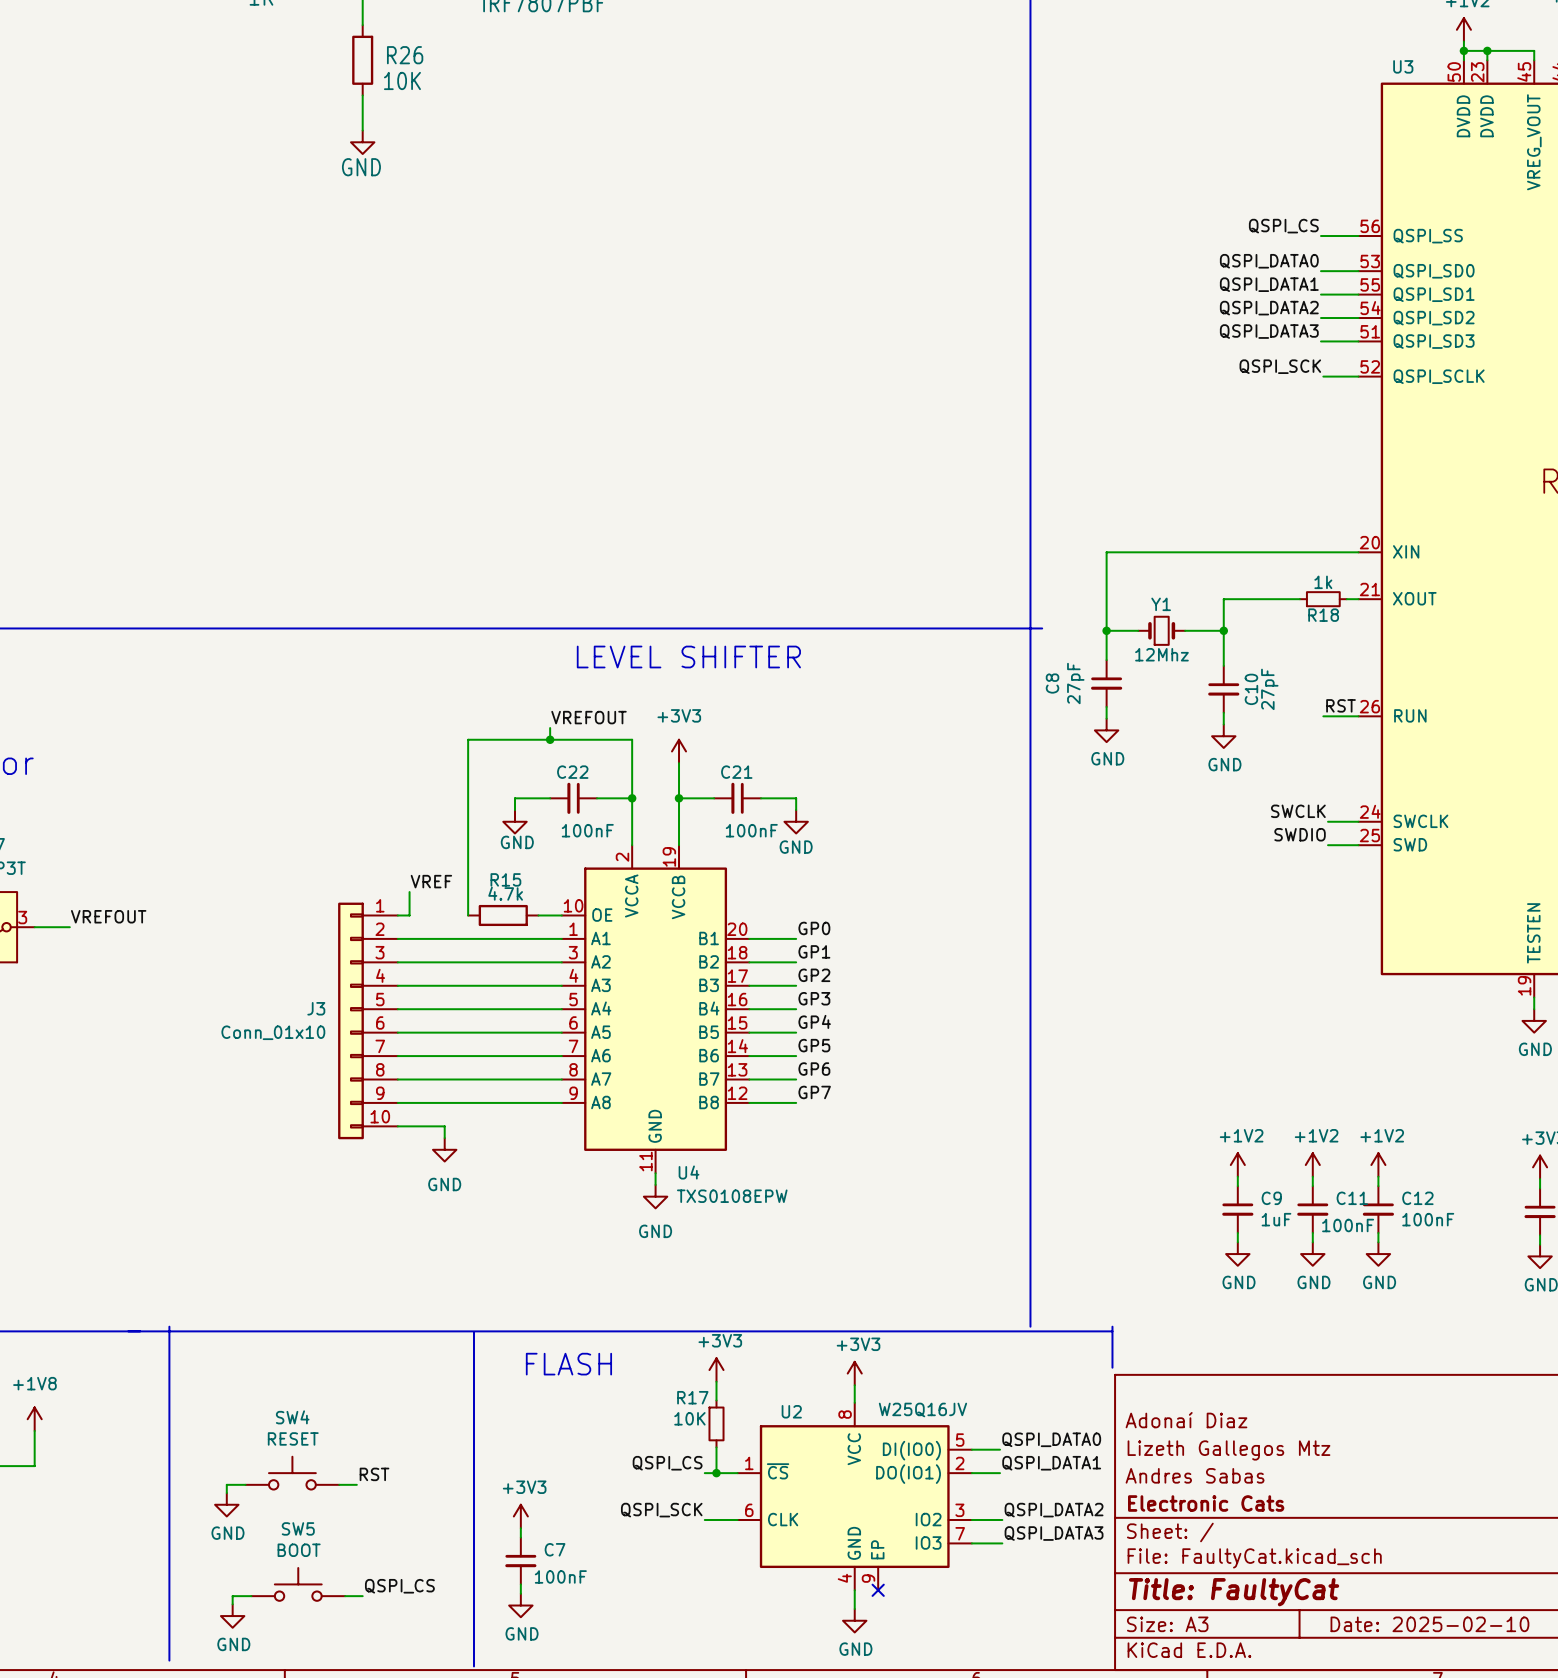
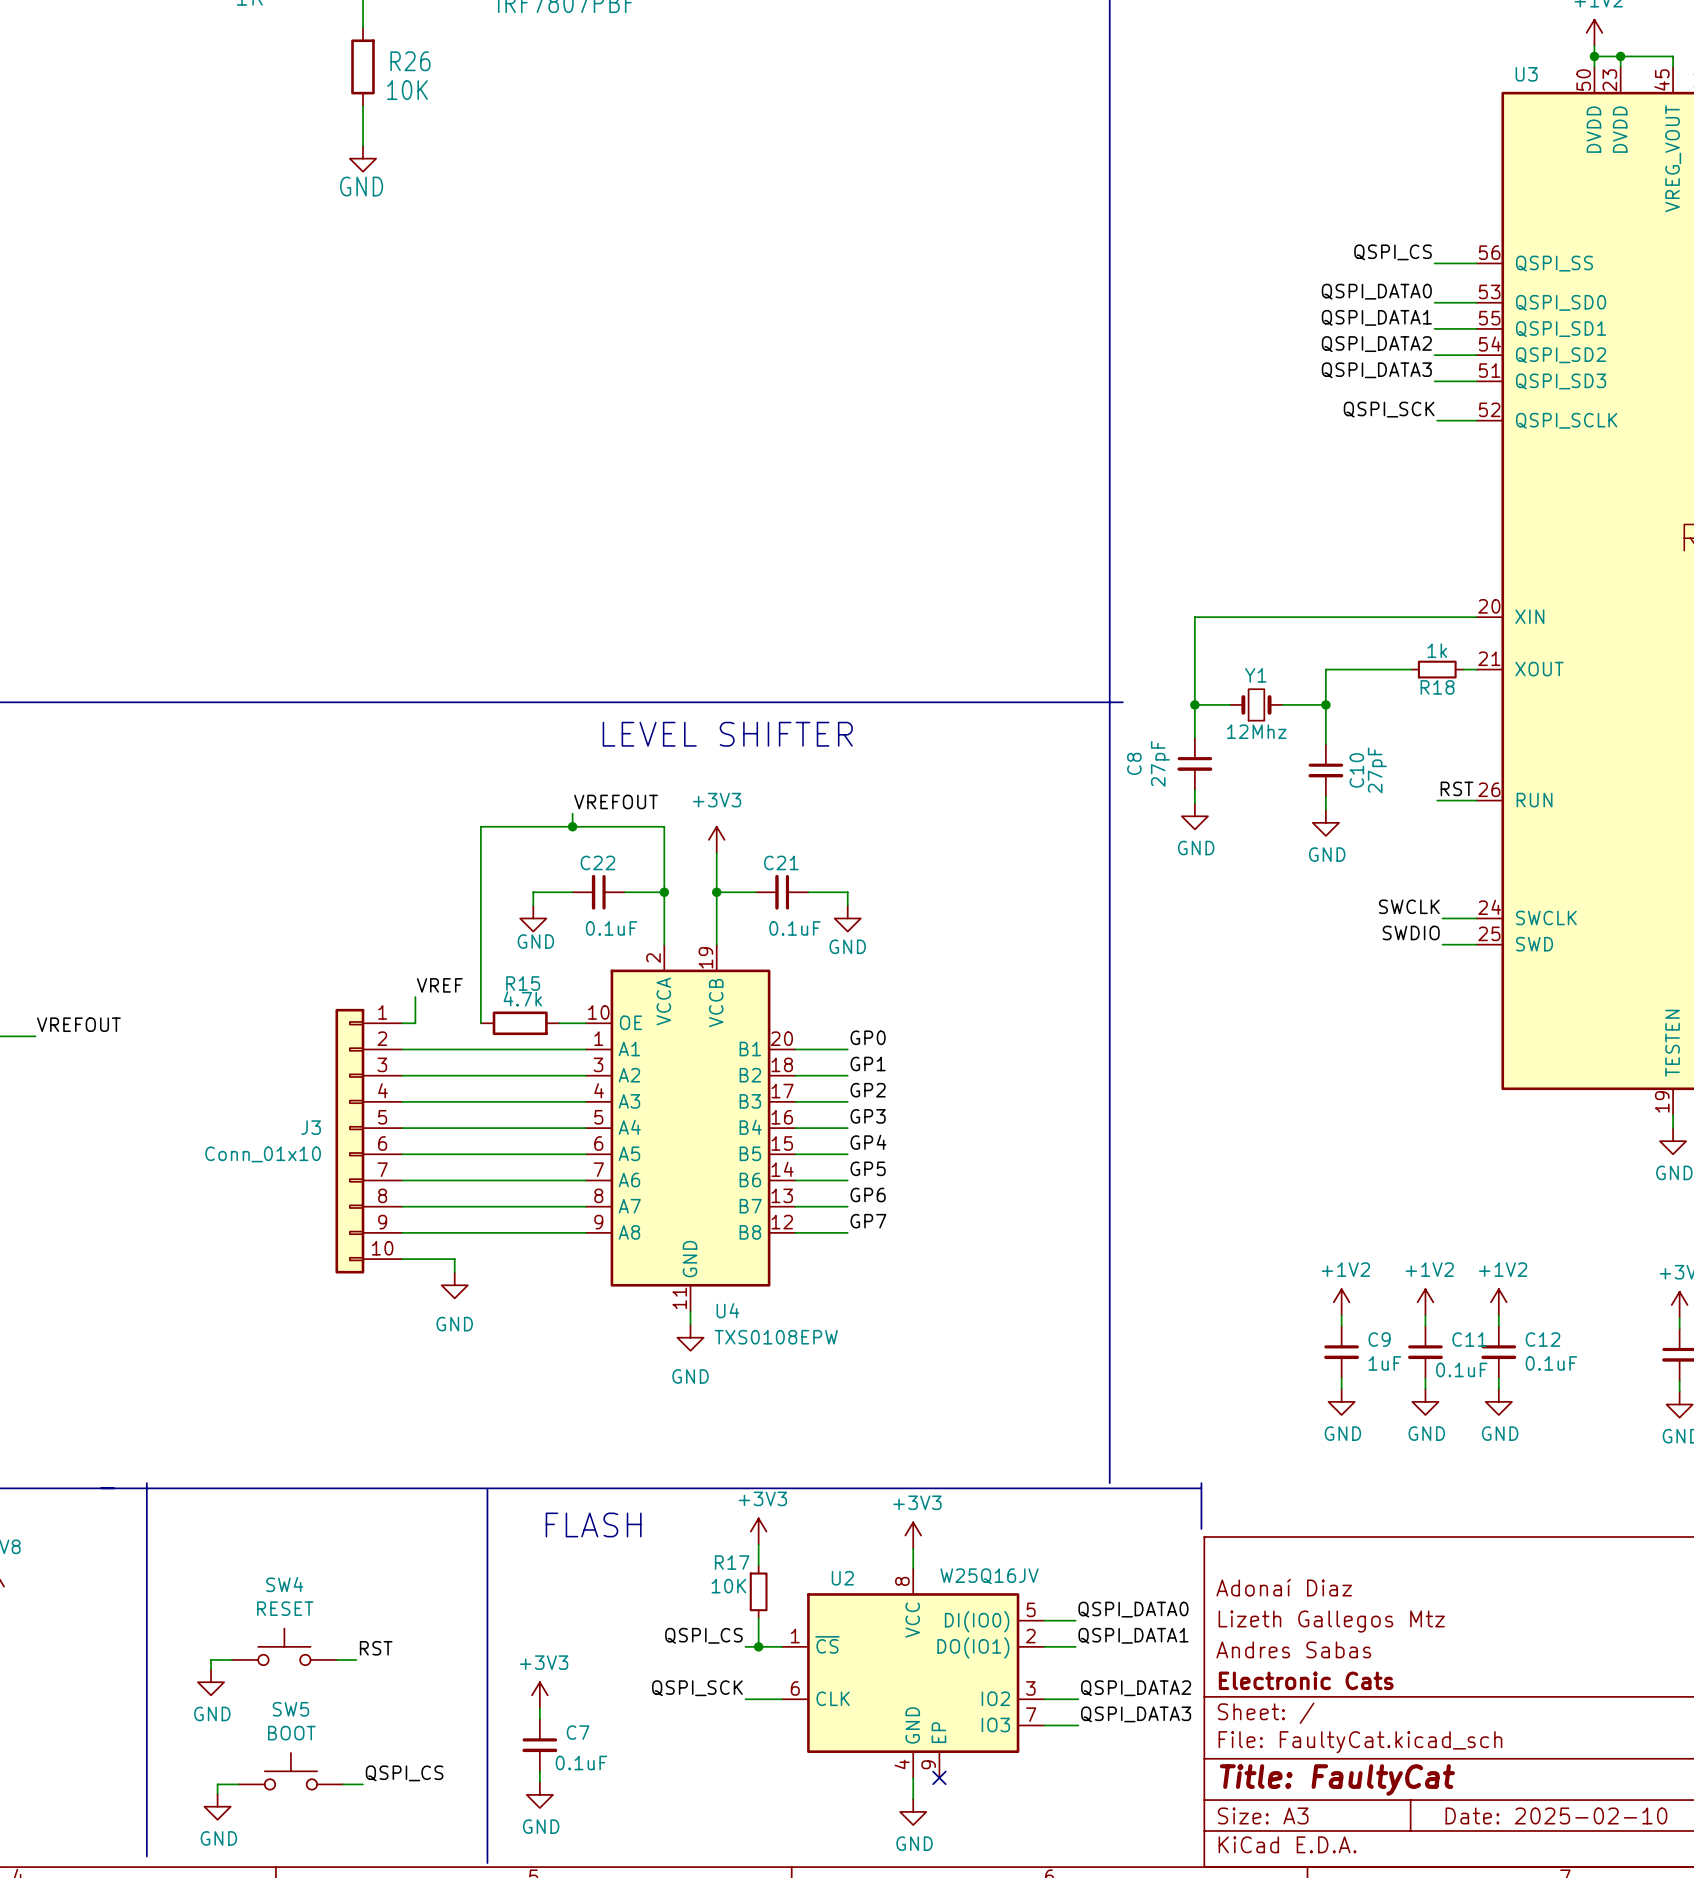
C22 value: 100nF (587, 830) -> 0.1uF (611, 928)
C21 value: 100nF (751, 830) -> 0.1uF (794, 928)
C12 value: 100nF (1428, 1219) -> 0.1uF (1551, 1363)
C11 value: 100nF (1348, 1225) -> 0.1uF (1461, 1369)
C7 value: 100nF (560, 1576) -> 0.1uF (581, 1762)

